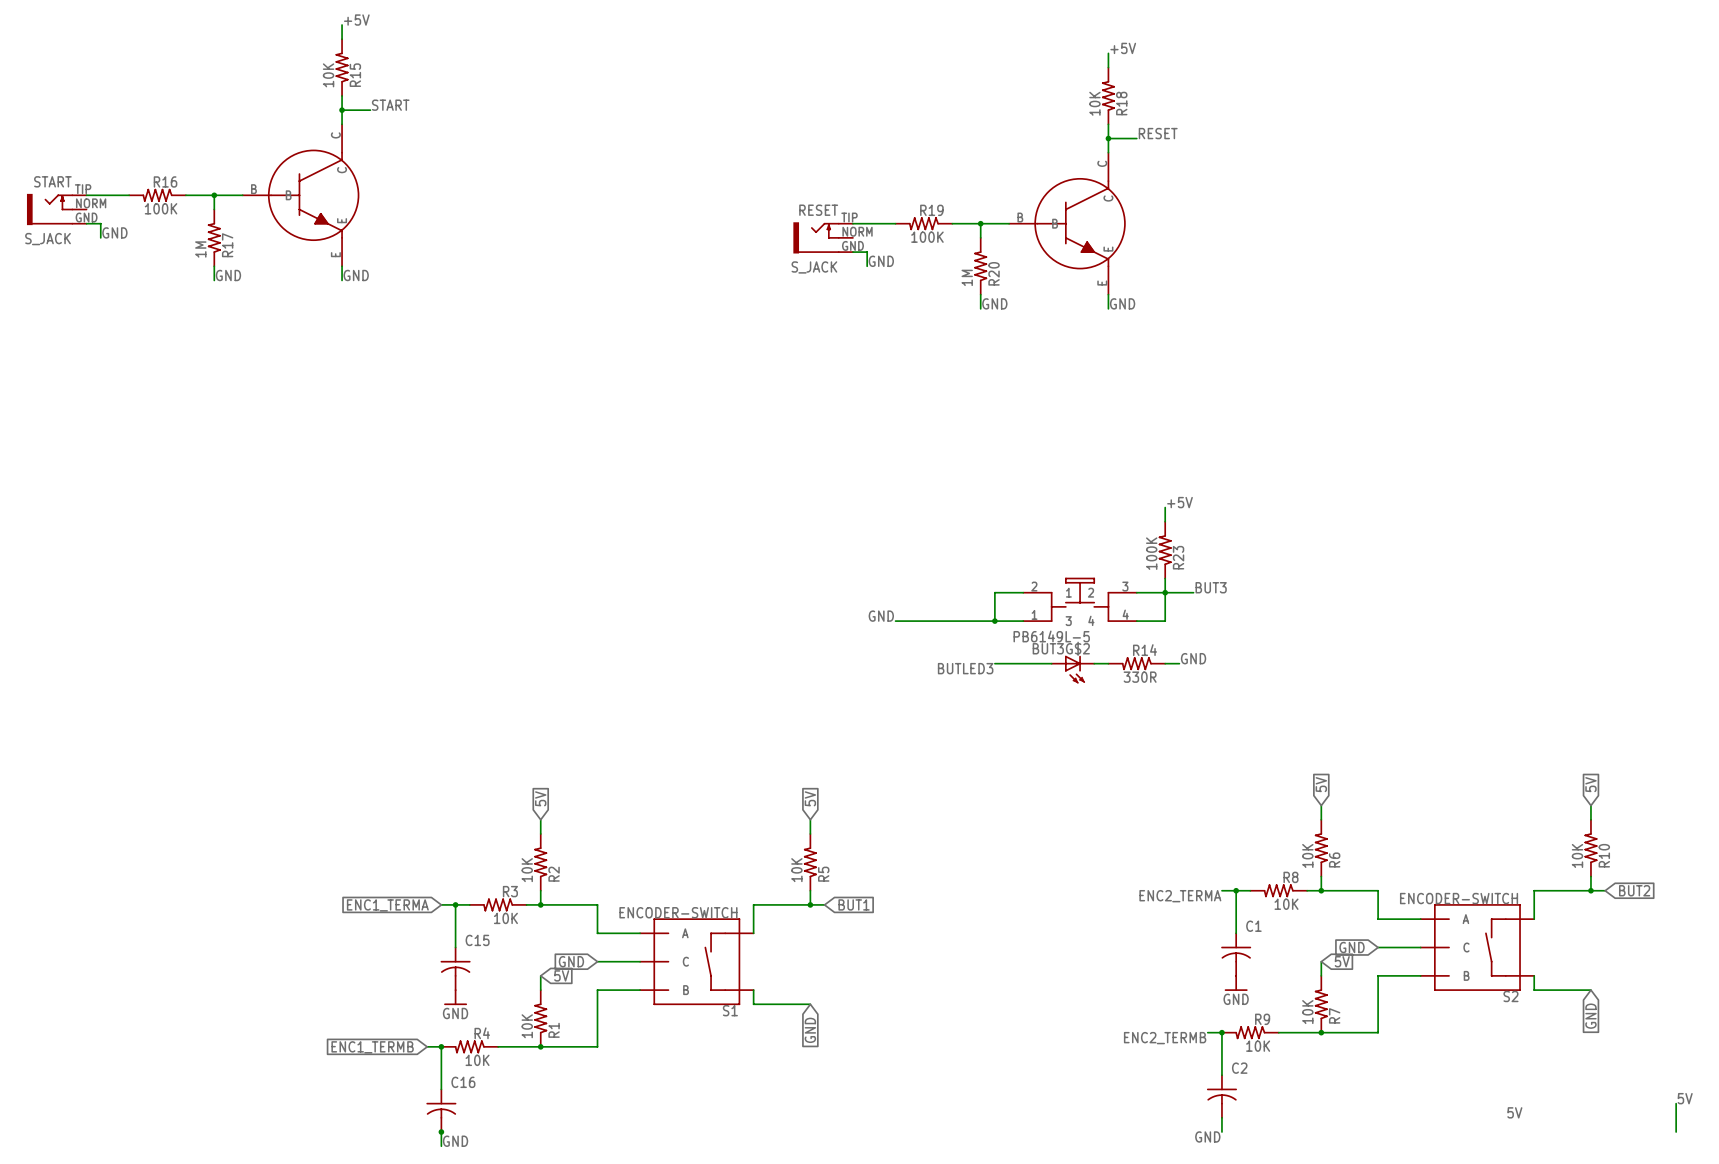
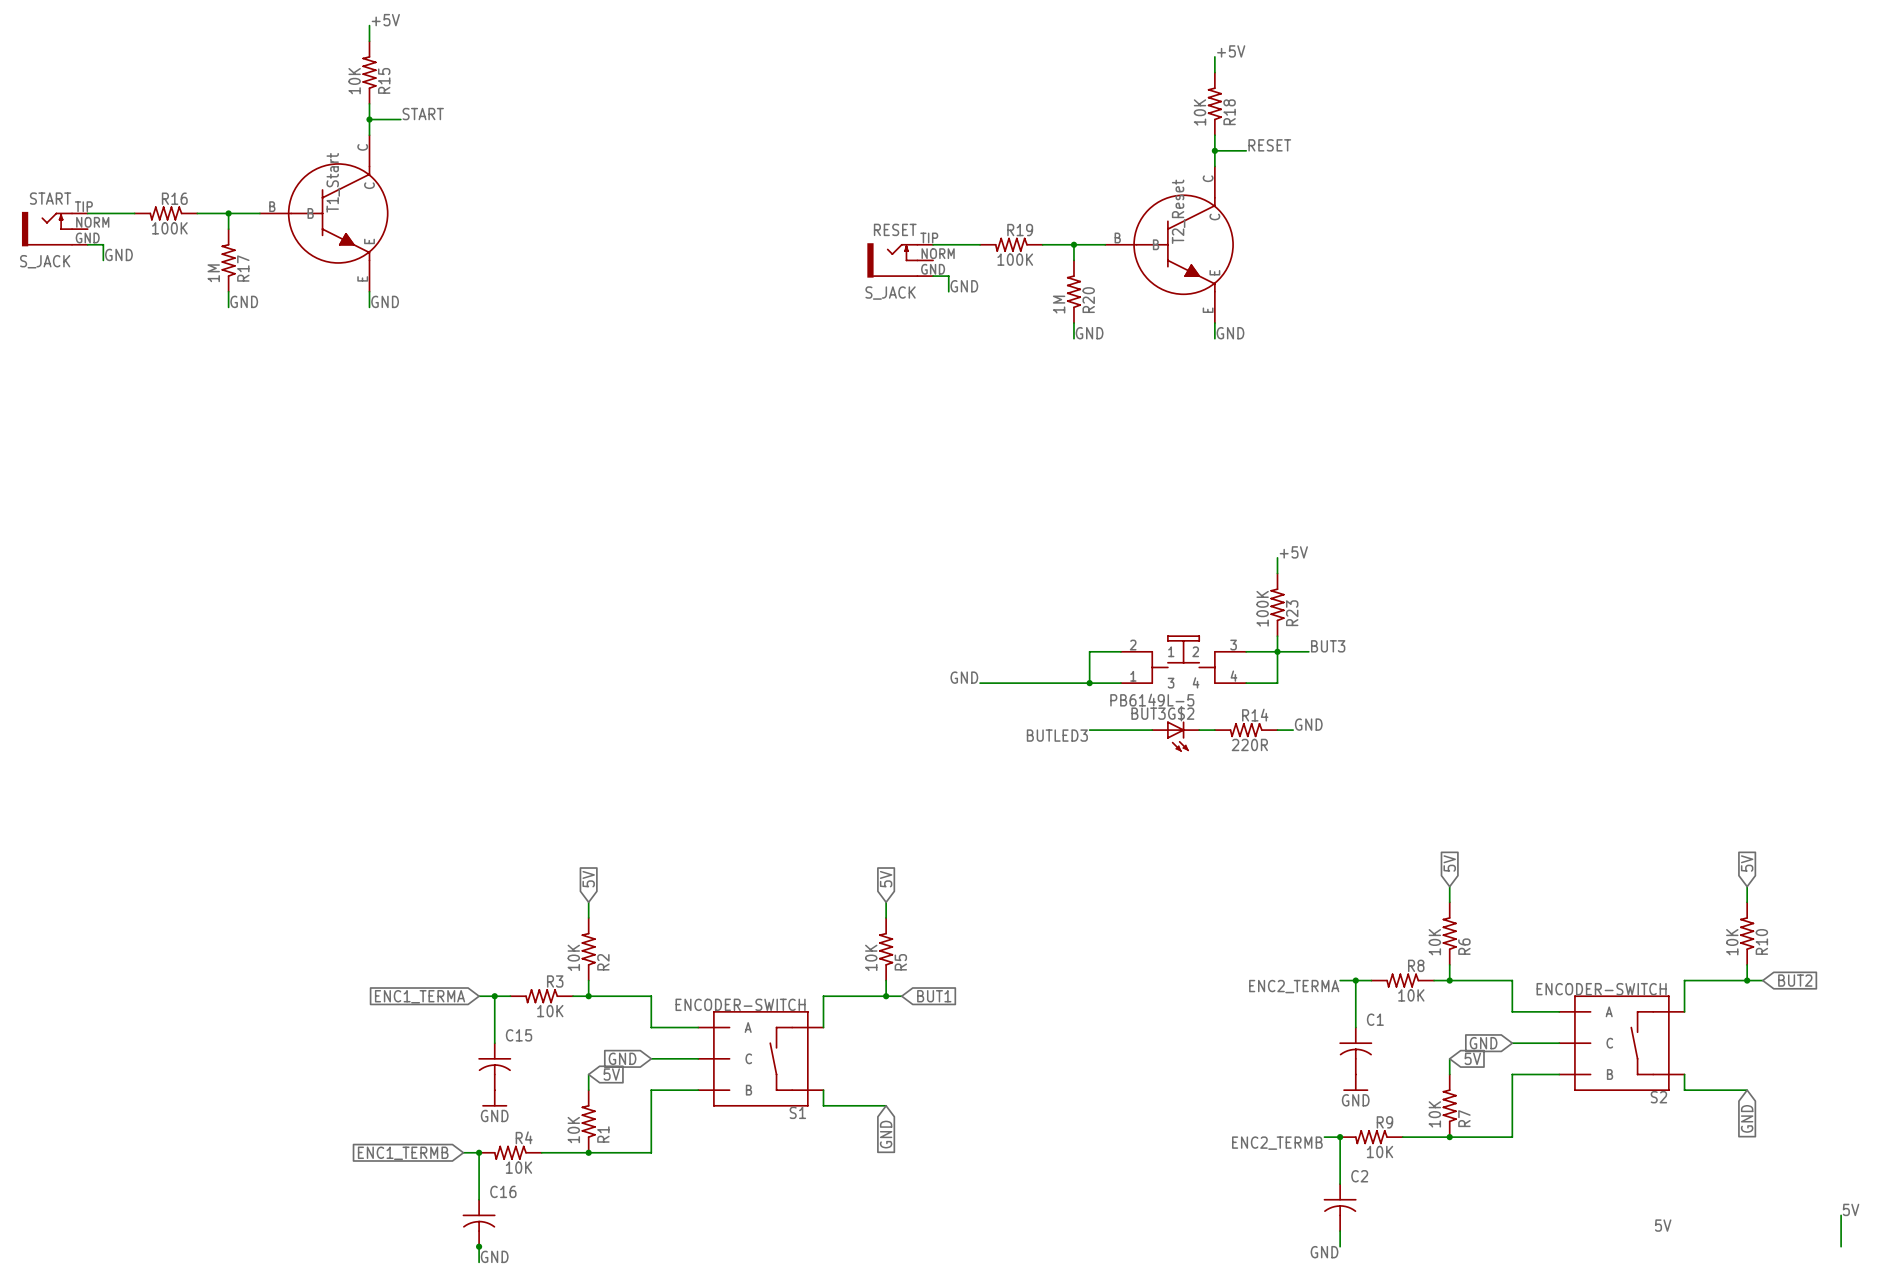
part text: none -> T1_Start (333, 182)
part text: none -> T2_Reset (1178, 211)
R14 value: 330R (1140, 677) -> 220R (1249, 744)

